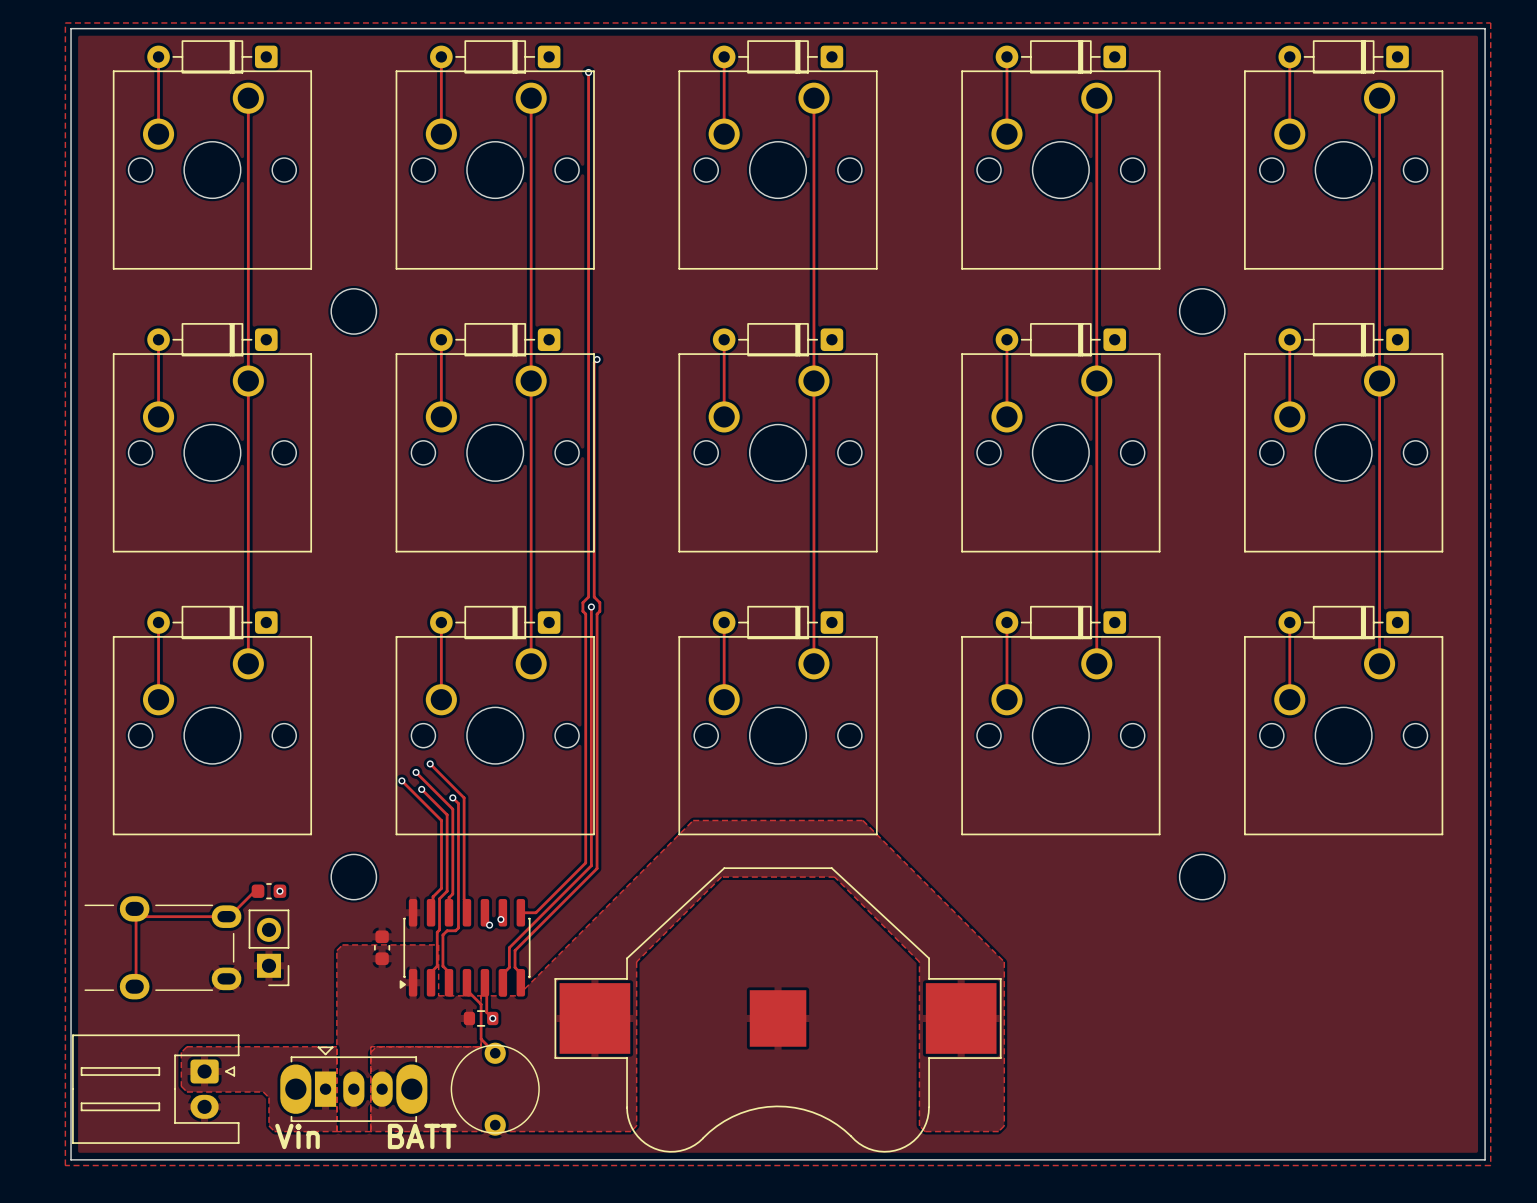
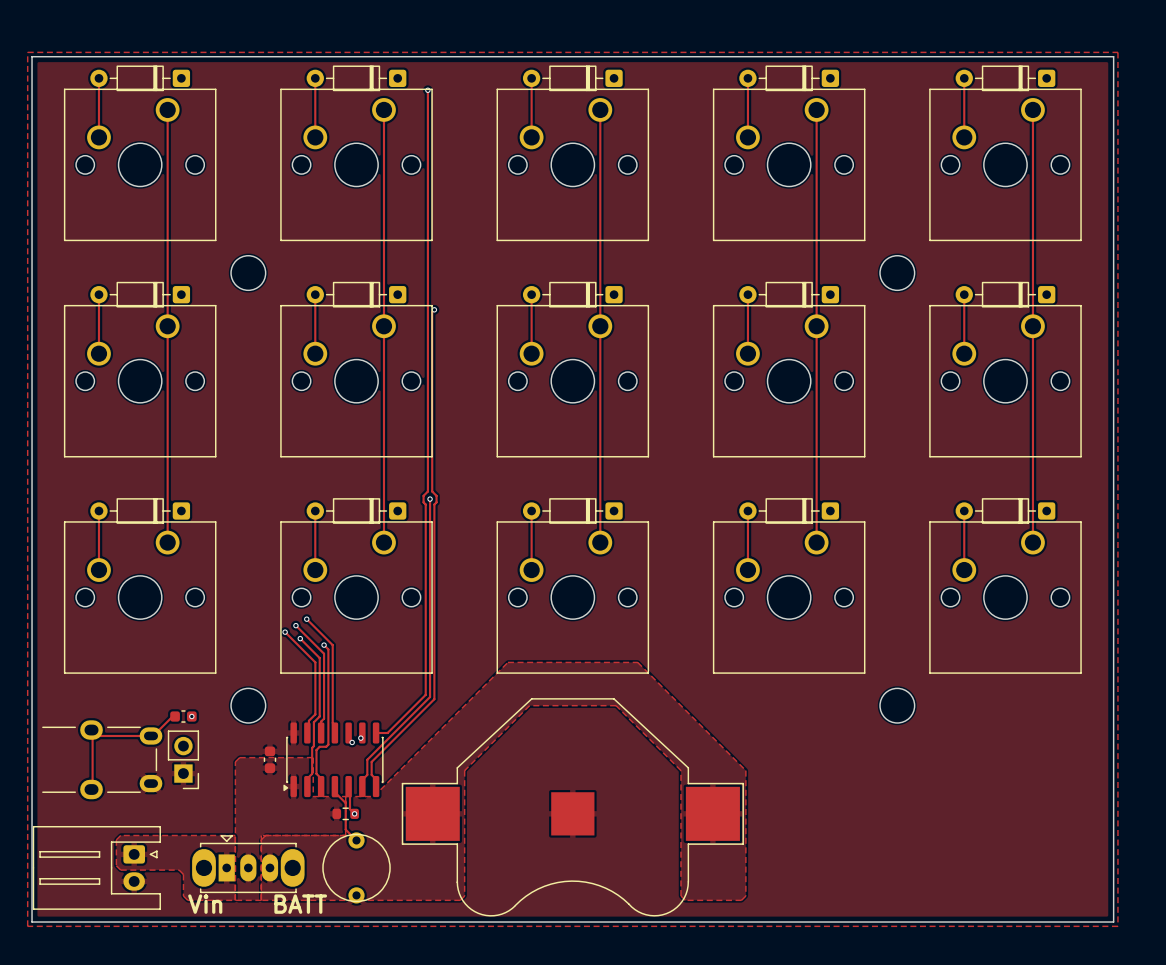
part footprint: [84, 896, 242, 1000] -> [42, 720, 163, 800]
track: (134, 908) (142, 916) (158, 916) -> (91, 789) (91, 730) (99, 735)
track: (136, 910) (134, 986) -> none

